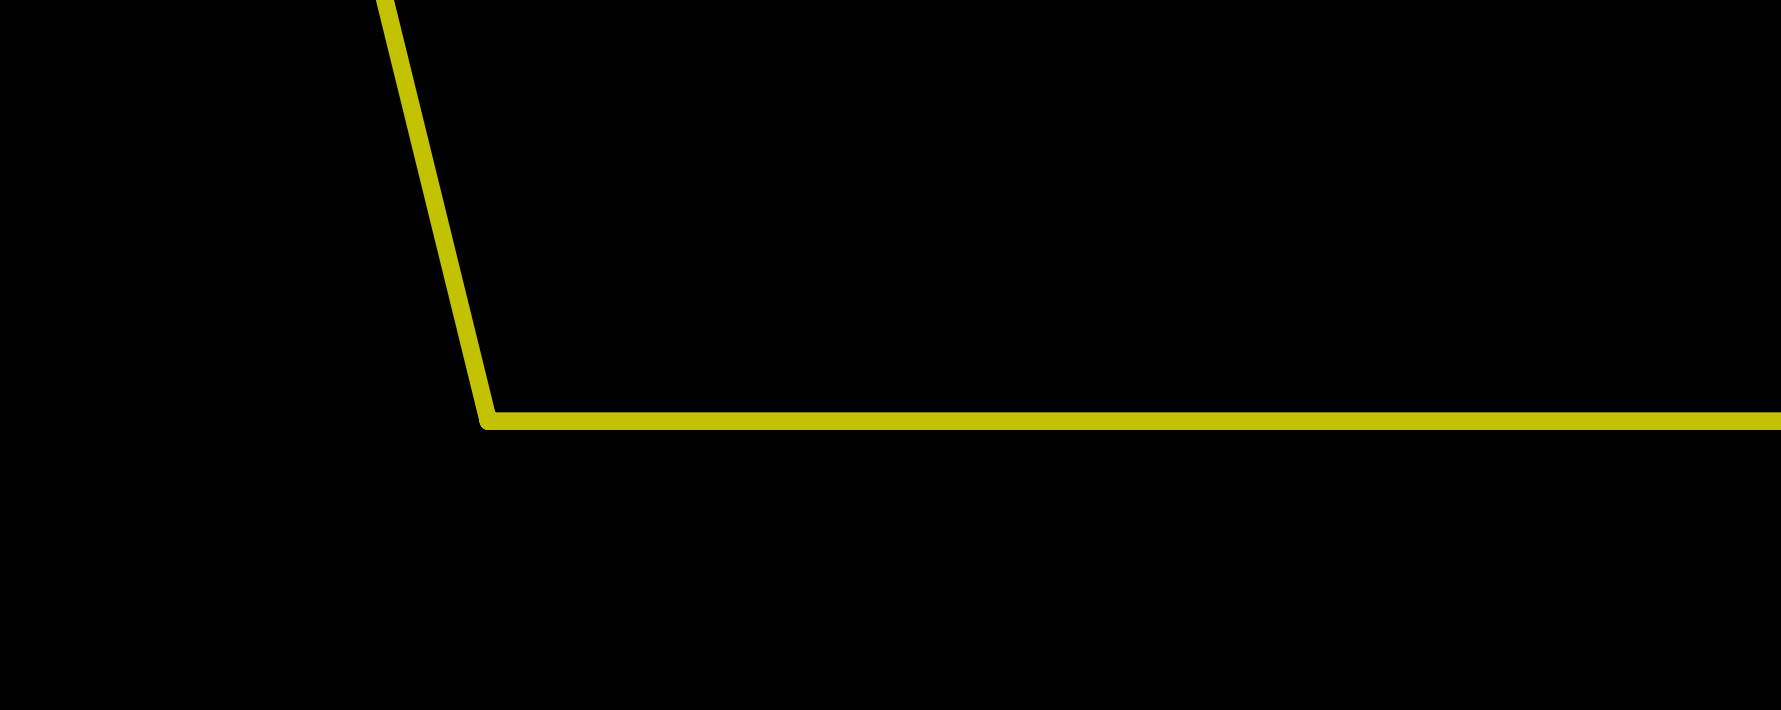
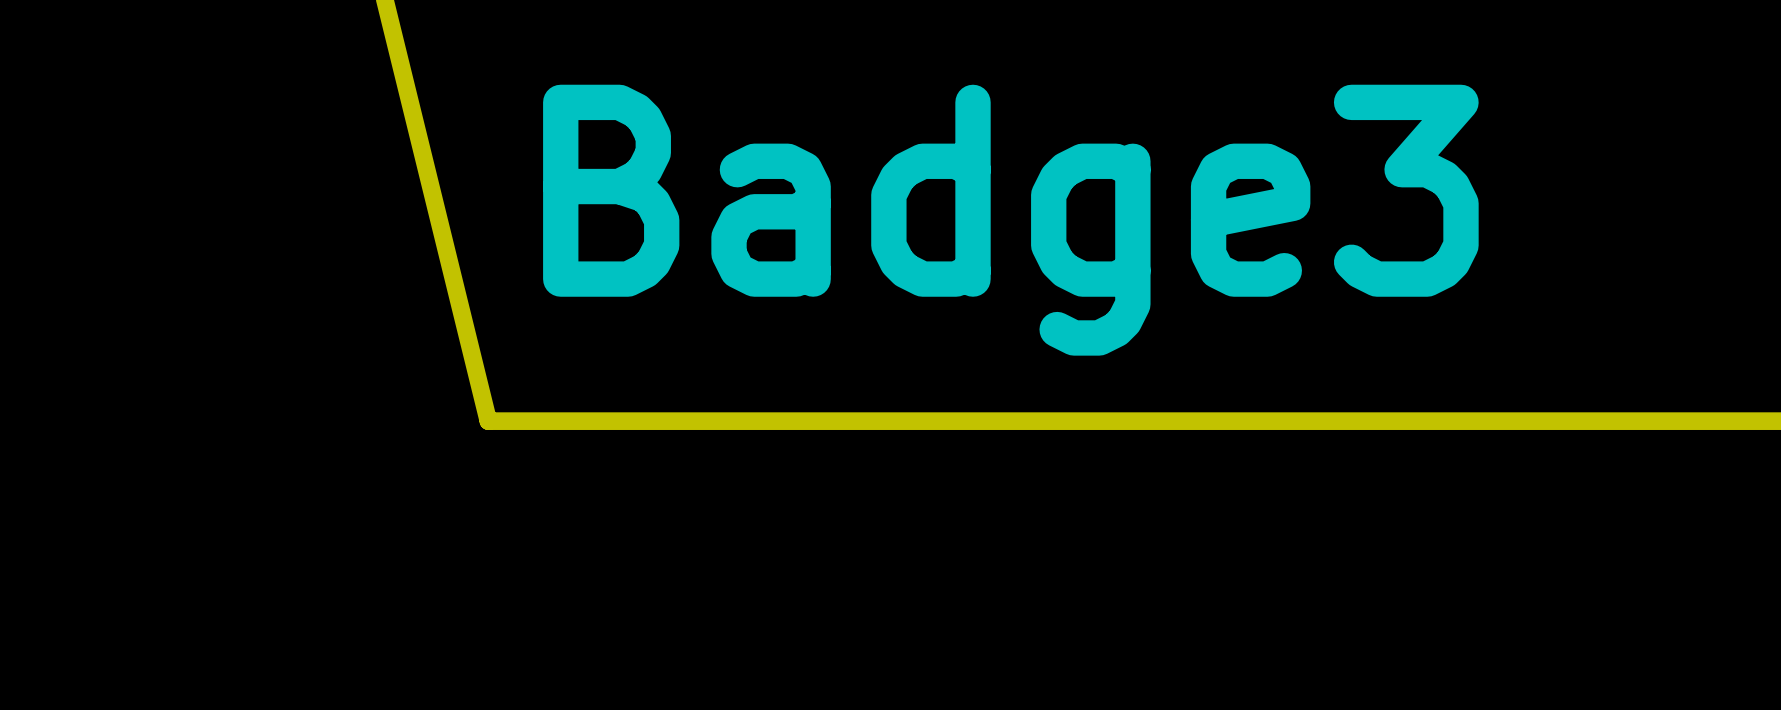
text: none -> Badge3 (1010, 220)

